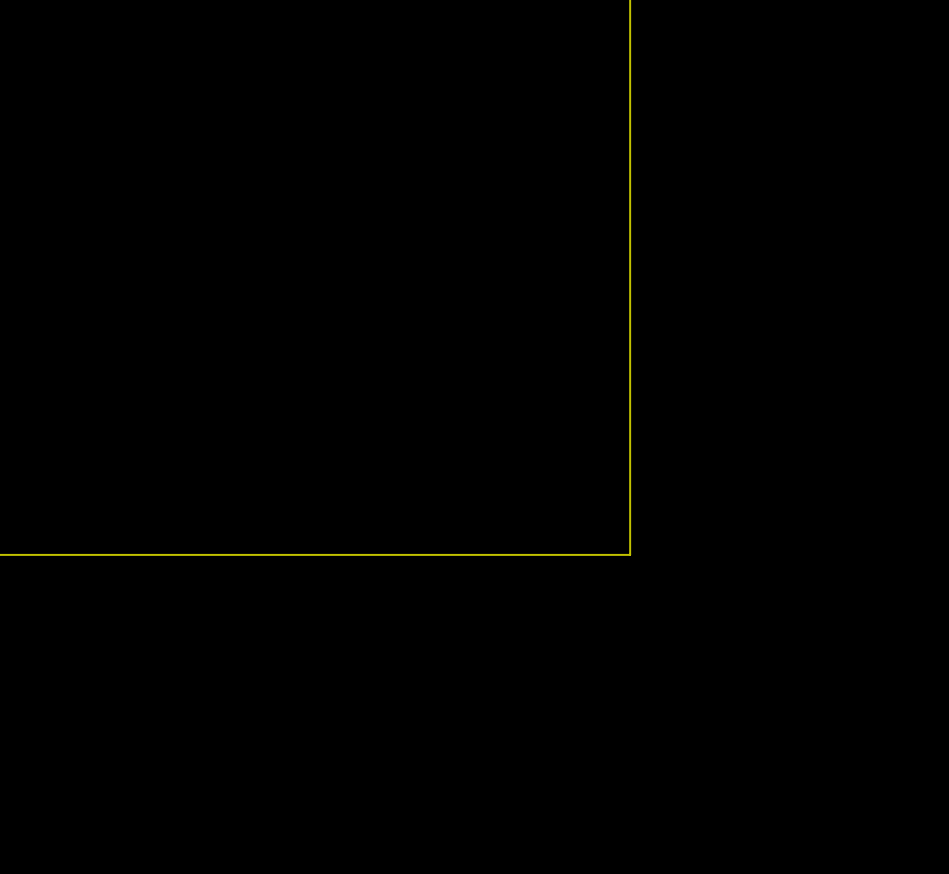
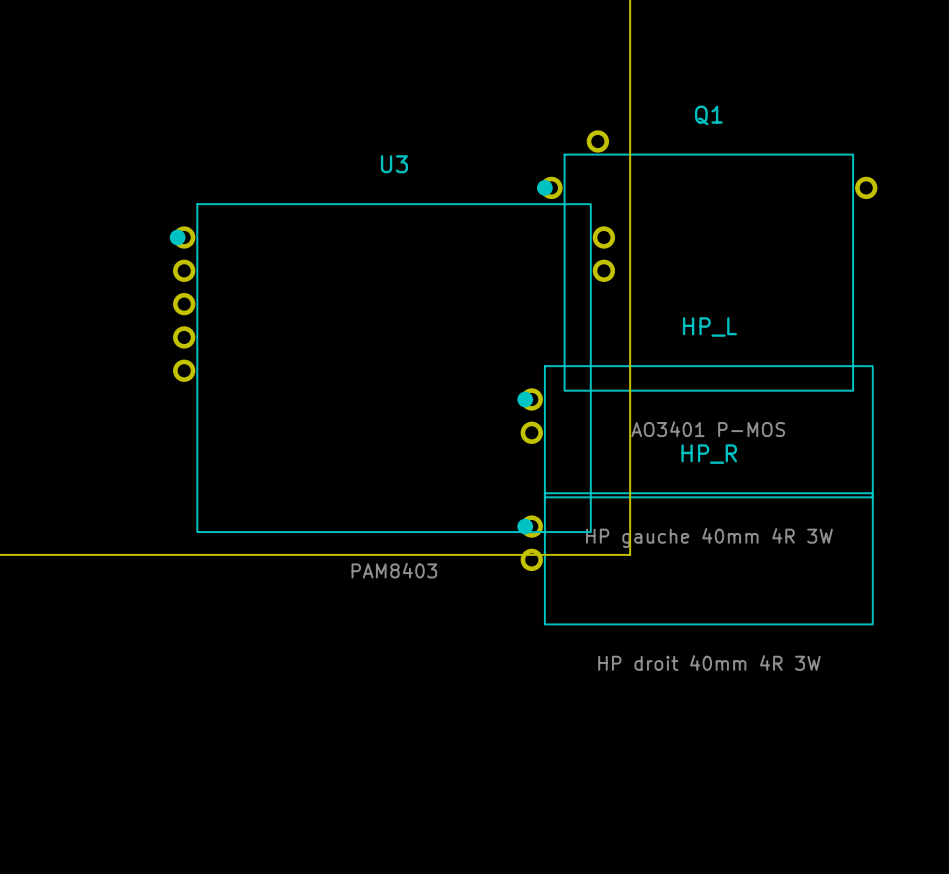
Q1: none -> AO3401 P-MOS (707, 261)
U3: none -> PAM8403 (392, 368)
HP_L: none -> HP gauche 40mm 4R 3W (695, 431)
HP_R: none -> HP droit 40mm 4R 3W (695, 558)

